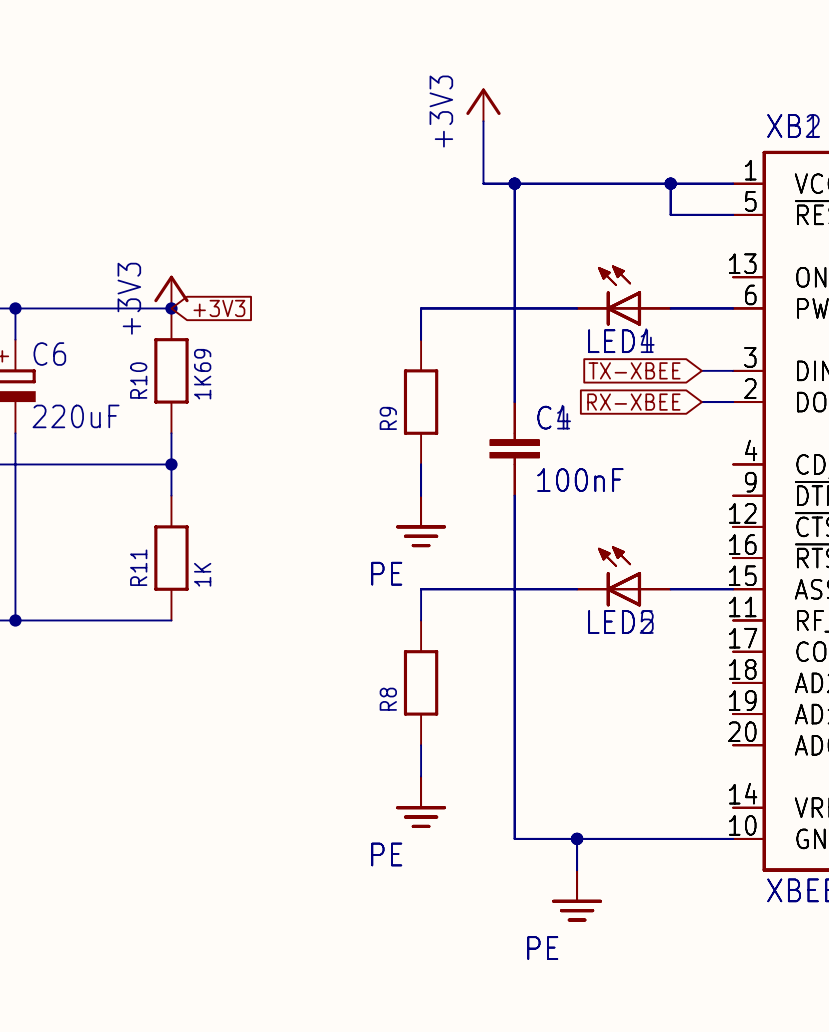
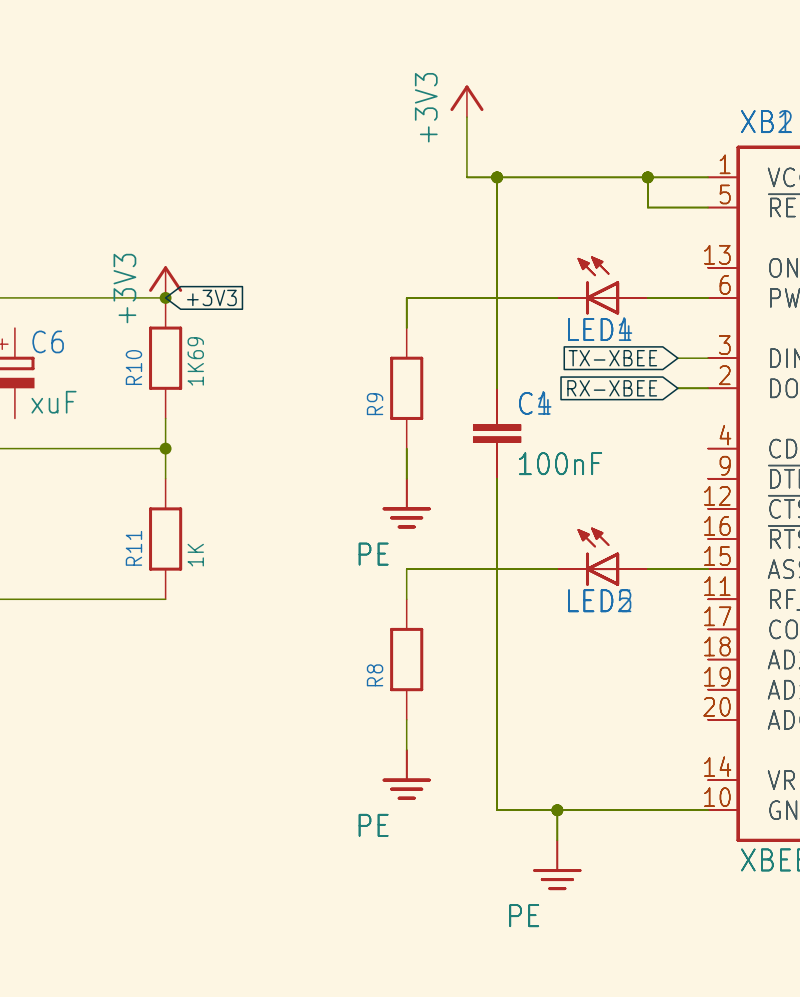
wire: (15, 308) (15, 339) -> none
junction: (15, 308) -> none
C6 value: 220uF (76, 416) -> xuF (54, 402)
wire: (15, 433) (15, 620) -> none
junction: (15, 620) -> none

